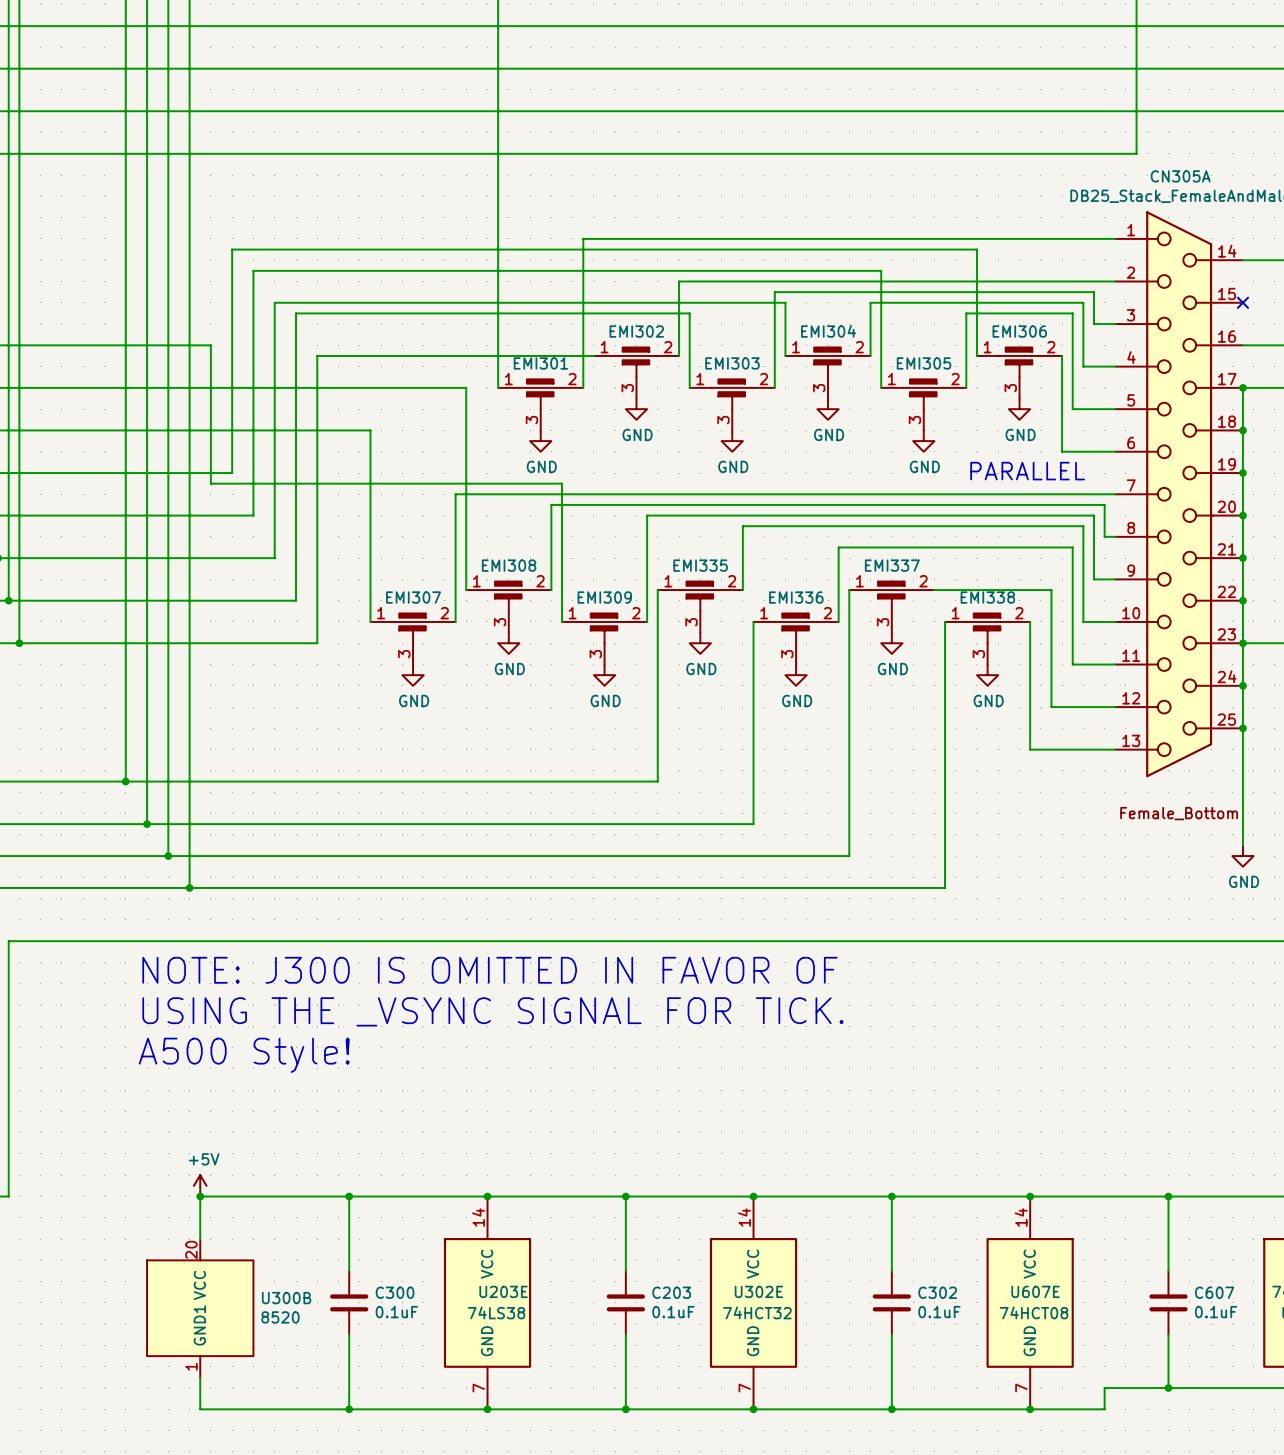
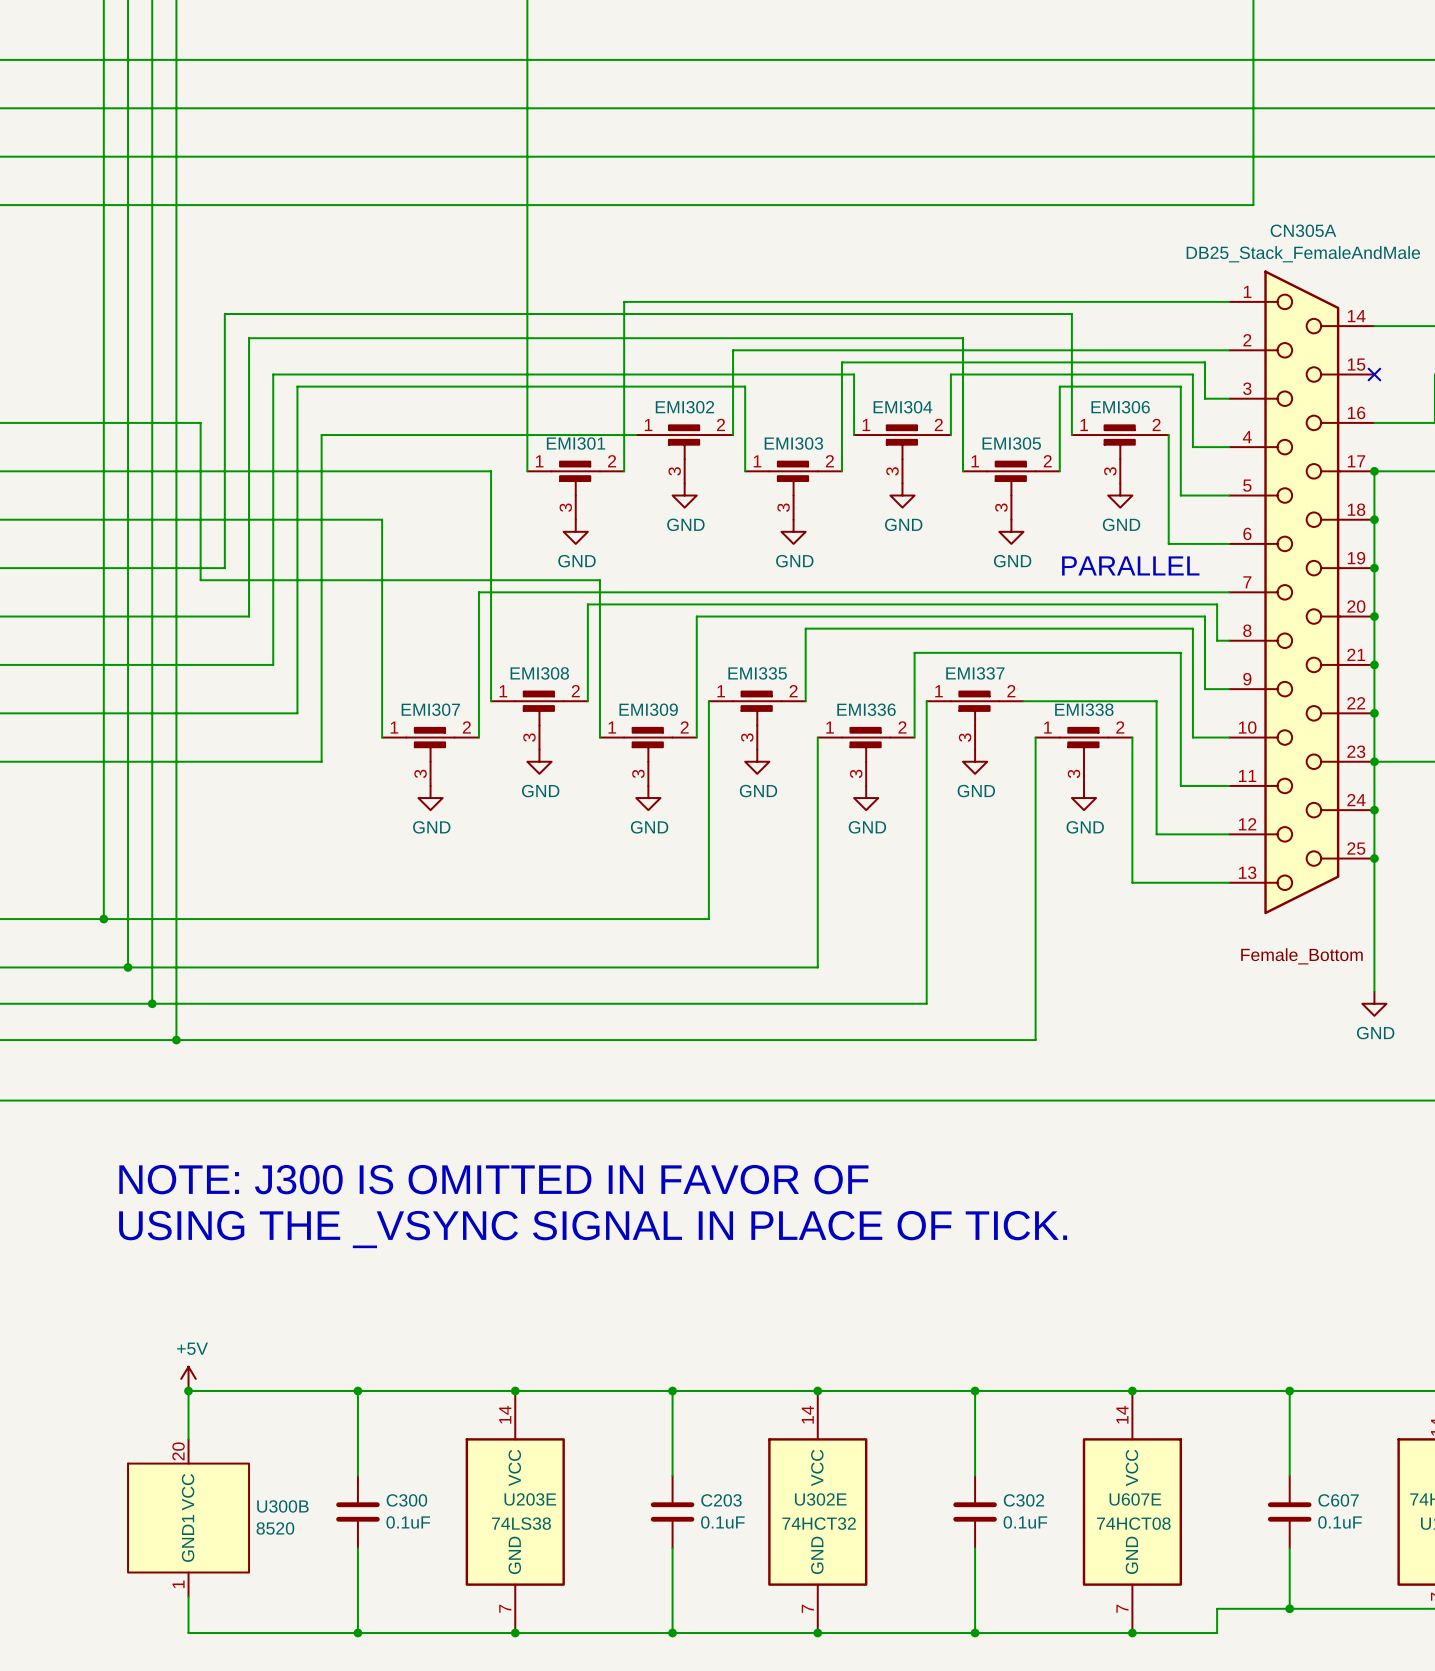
text: NOTE: J300 IS OMITTED IN FAVOR OF (489, 970) -> none
text: USING THE _VSYNC SIGNAL FOR TICK. (492, 1011) -> NOTE: J300 IS OMITTED IN FAVOR OF (493, 1179)
text: A500 Style! (244, 1055) -> USING THE _VSYNC SIGNAL IN PLACE OF TICK. (593, 1229)

